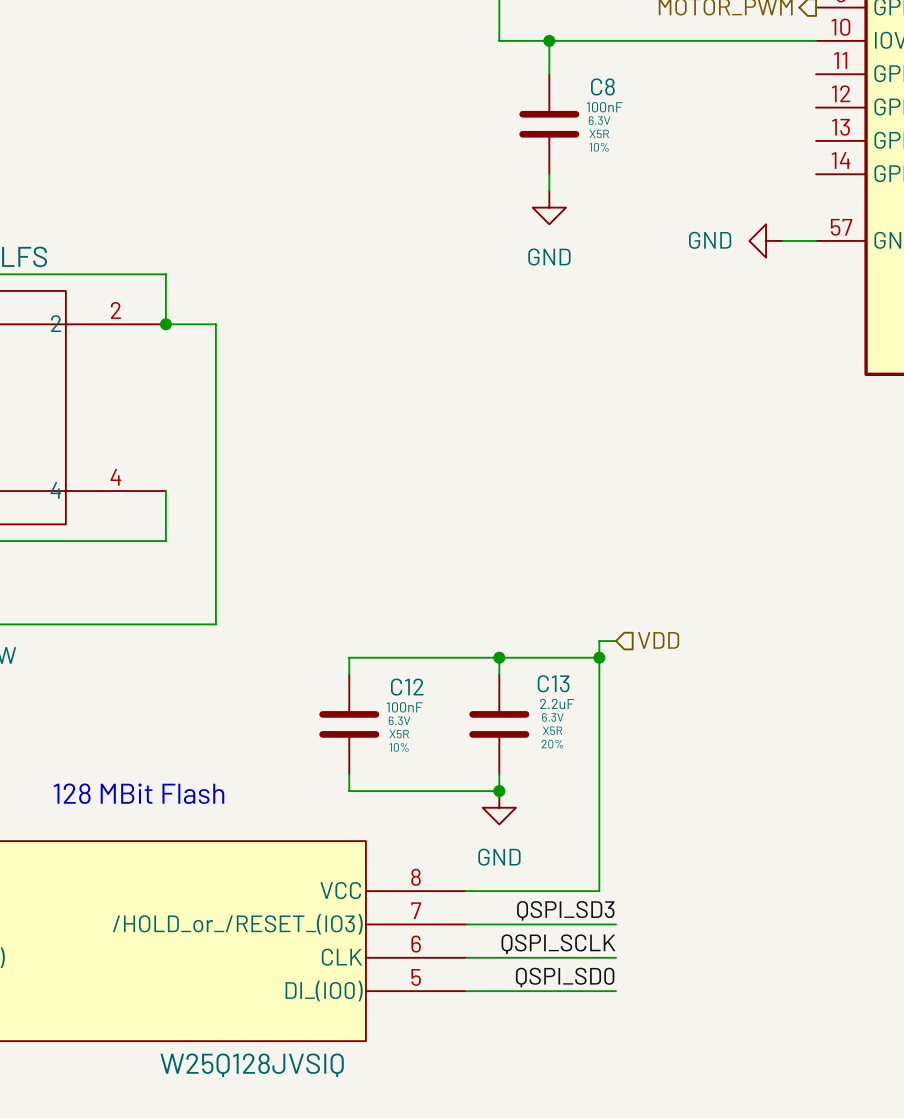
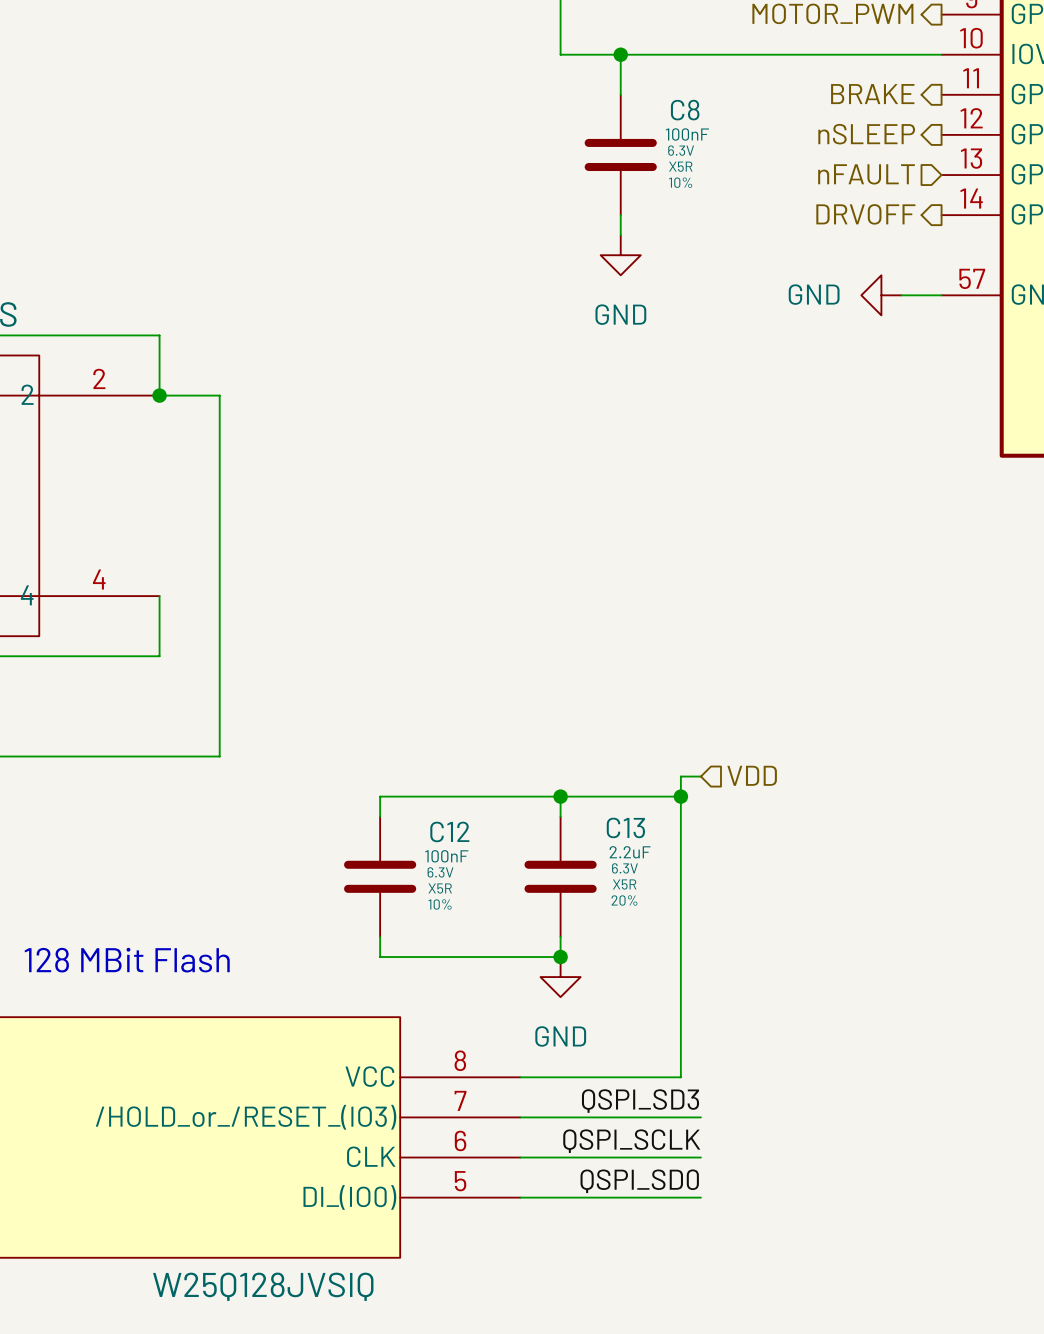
hierarchical label: none -> BRAKE (872, 94)
hierarchical label: none -> nSLEEP (866, 134)
hierarchical label: none -> nFAULT (866, 174)
hierarchical label: none -> DRVOFF (865, 214)

